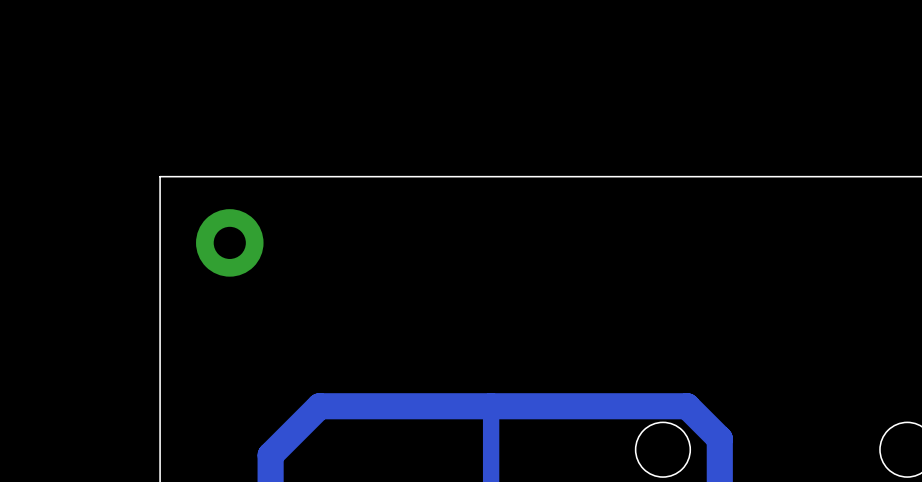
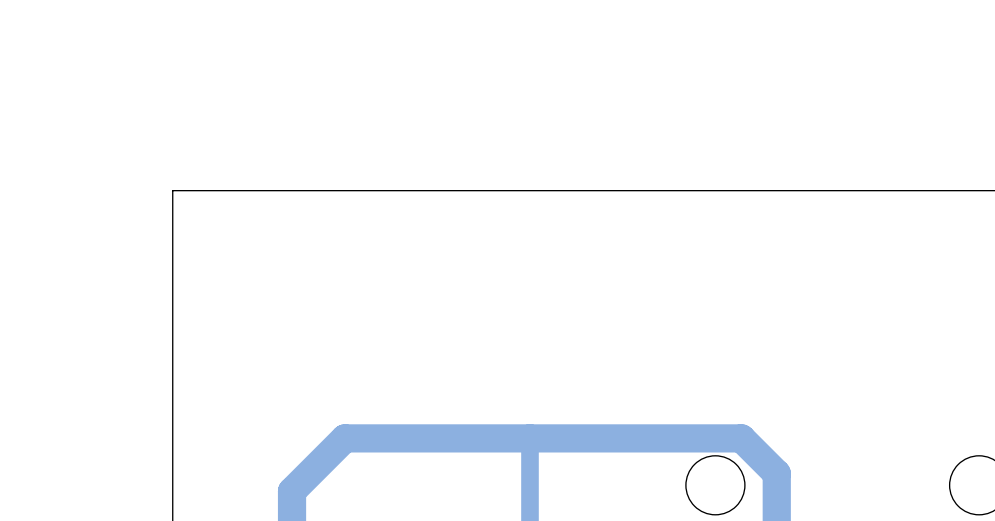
via: (229, 242) -> none

